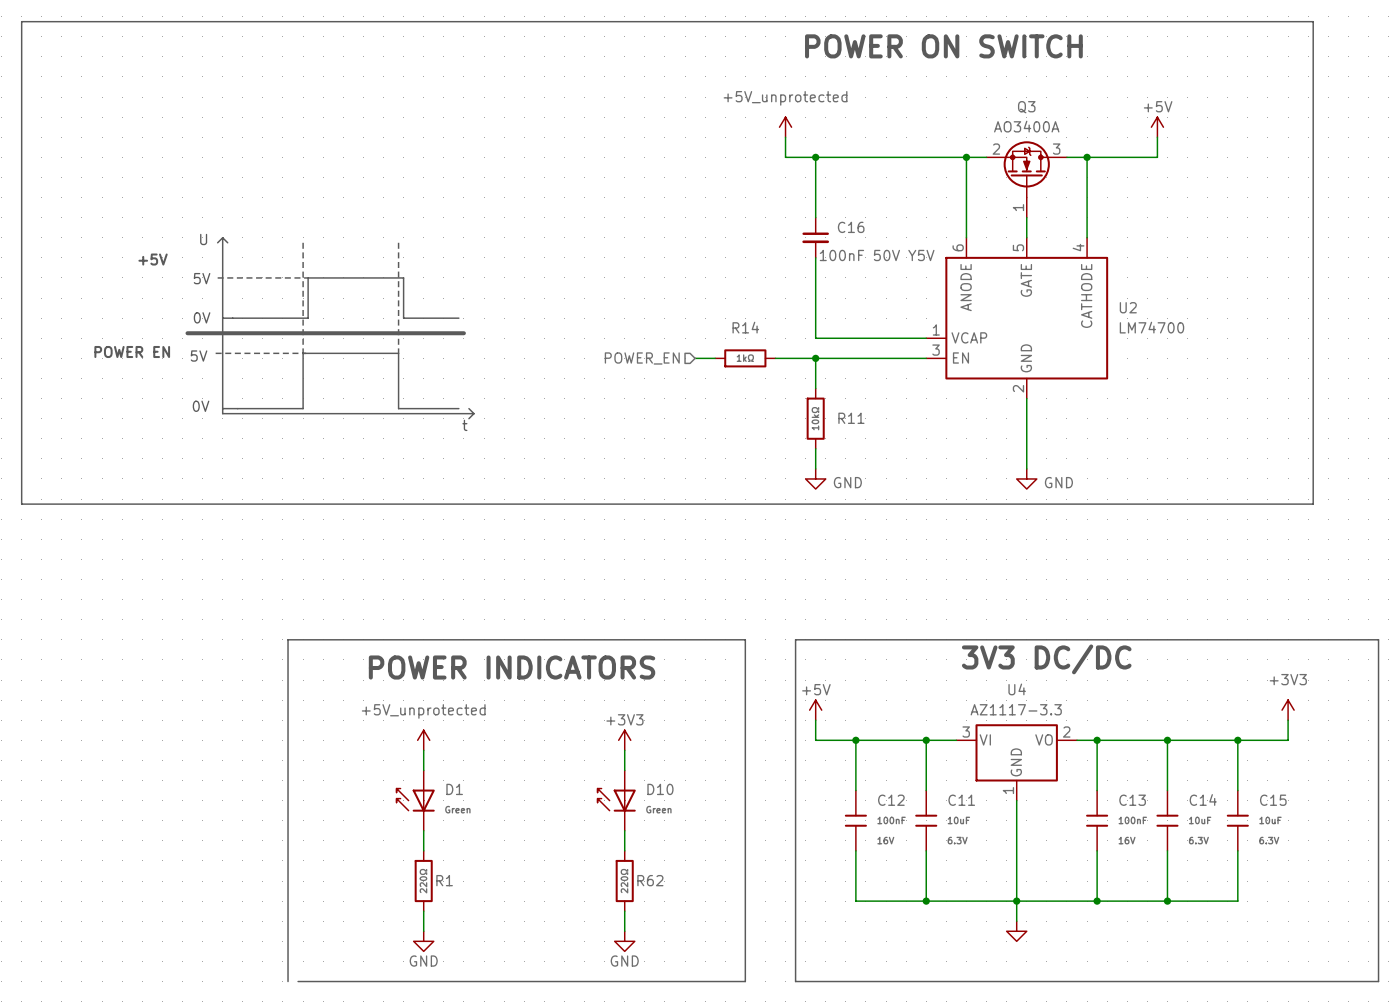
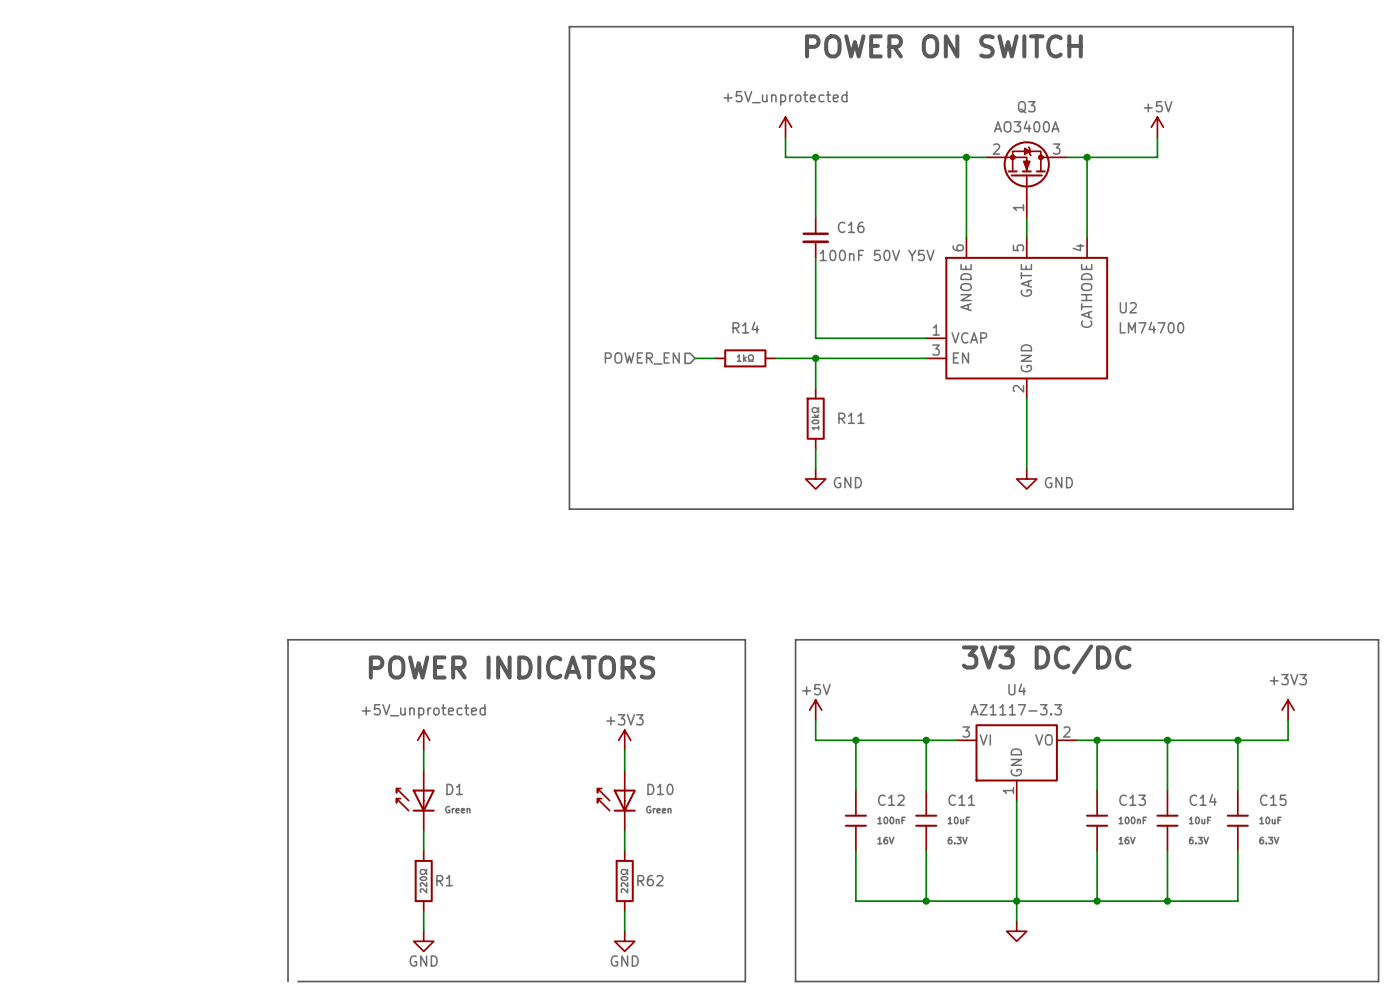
line: (21, 21) (1313, 21) (1313, 504) (21, 504) (21, 21) -> (569, 26) (569, 509) (1293, 509) (1293, 26) (569, 26)
line: (222, 237) (222, 413) (473, 413) -> none
line: (222, 237) (227, 242) -> none
line: (222, 237) (217, 242) -> none
text: U (203, 239) -> none
line: (303, 242) (303, 353) -> none
line: (398, 242) (398, 353) -> none
text: +5V (153, 259) -> none
line: (217, 277) (308, 277) -> none
line: (308, 277) (403, 277) (403, 318) (458, 318) -> none
line: (308, 277) (308, 318) (222, 318) -> none
text: 5V (202, 278) -> none
text: 0V (202, 317) -> none
line: (187, 333) (463, 333) -> none
text: POWER EN (132, 352) -> none
line: (215, 353) (306, 353) -> none
line: (303, 353) (398, 353) -> none
line: (303, 353) (303, 408) (222, 408) -> none
line: (398, 353) (398, 408) (458, 408) -> none
text: 5V (199, 356) -> none
text: 0V (201, 406) -> none
line: (468, 408) (473, 413) -> none
line: (473, 413) (468, 418) -> none
text: t (464, 425) -> none

